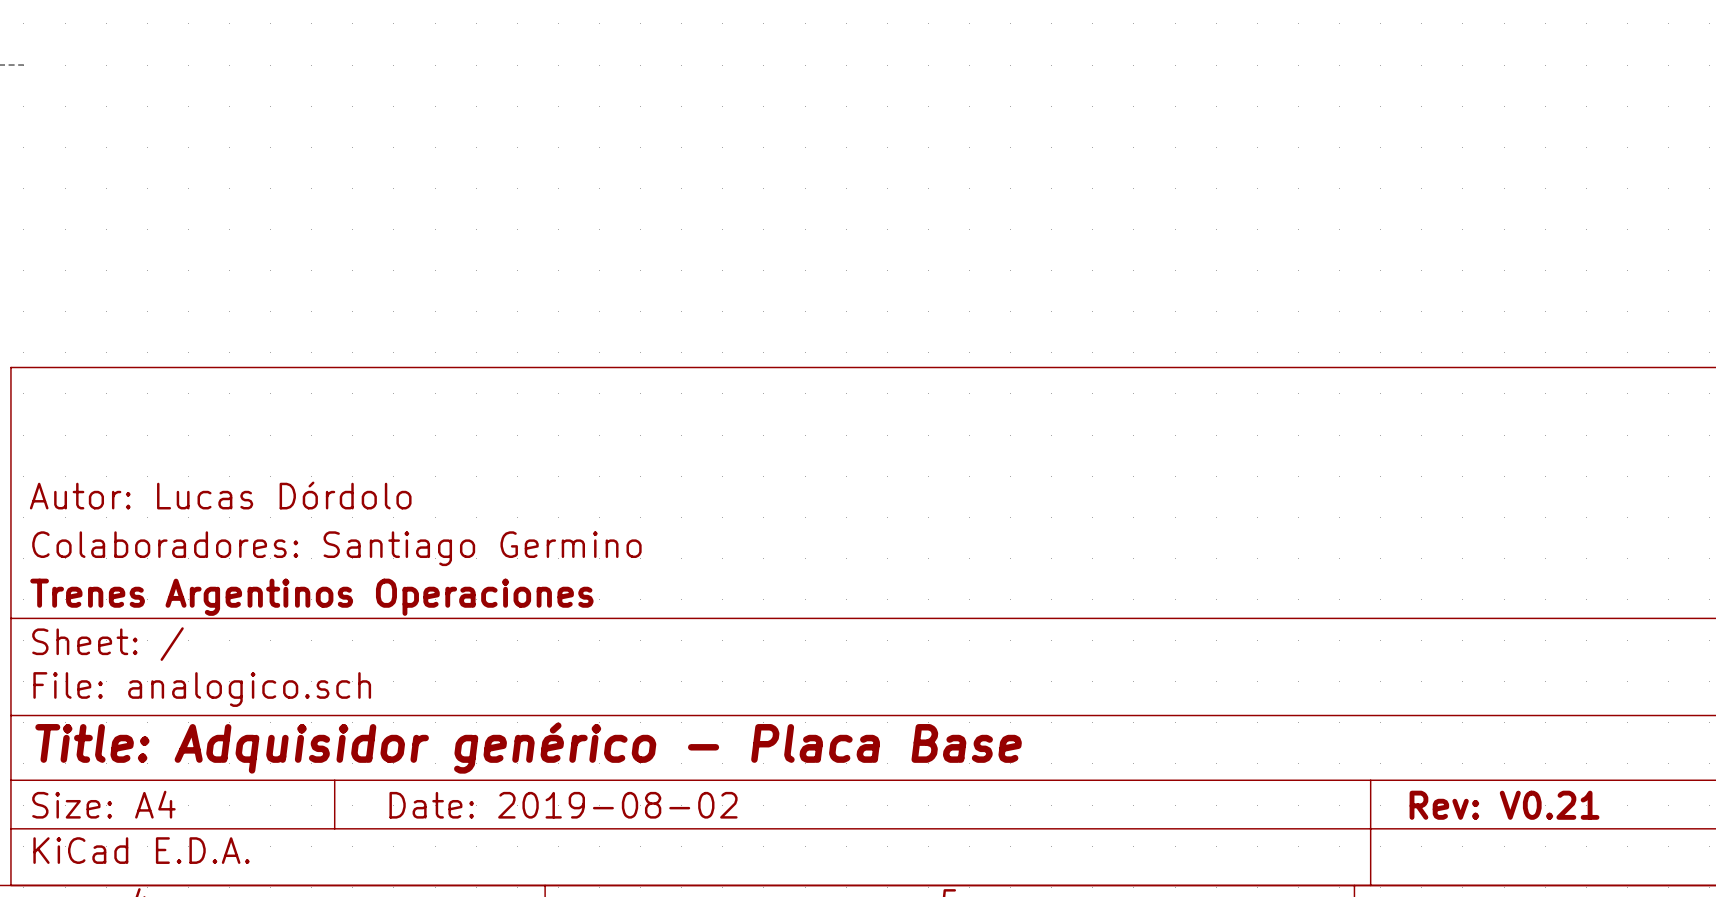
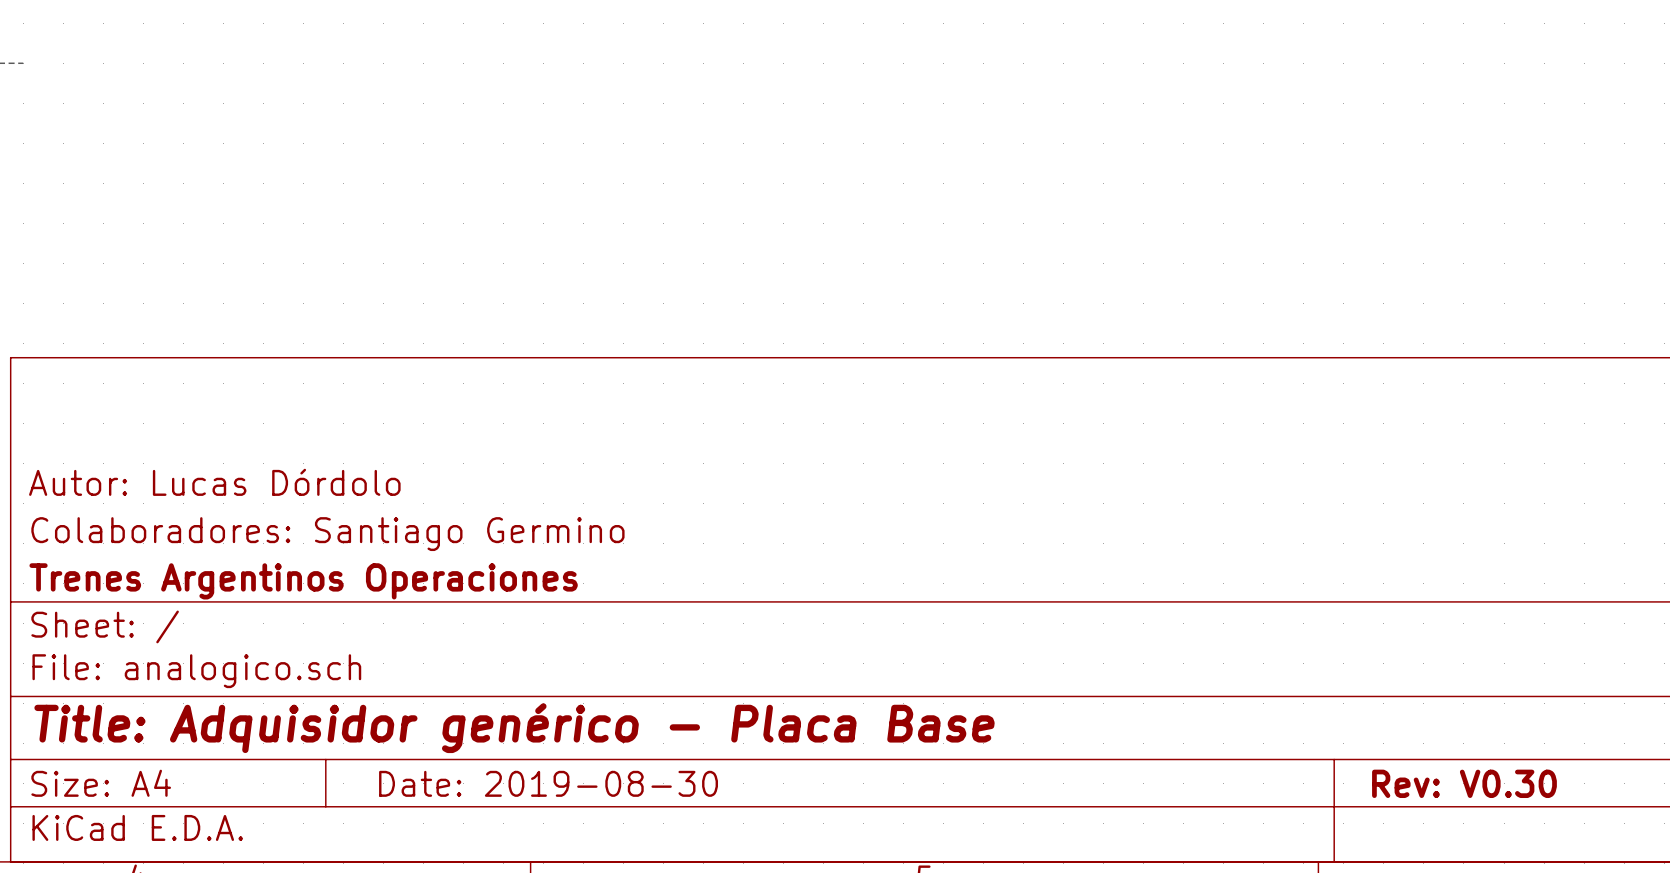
title block: Date: 2019-08-02 (563, 805) -> Date: 2019-08-30 (548, 783)
title block: Rev: V0.21 (1504, 805) -> Rev: V0.30 (1464, 783)

